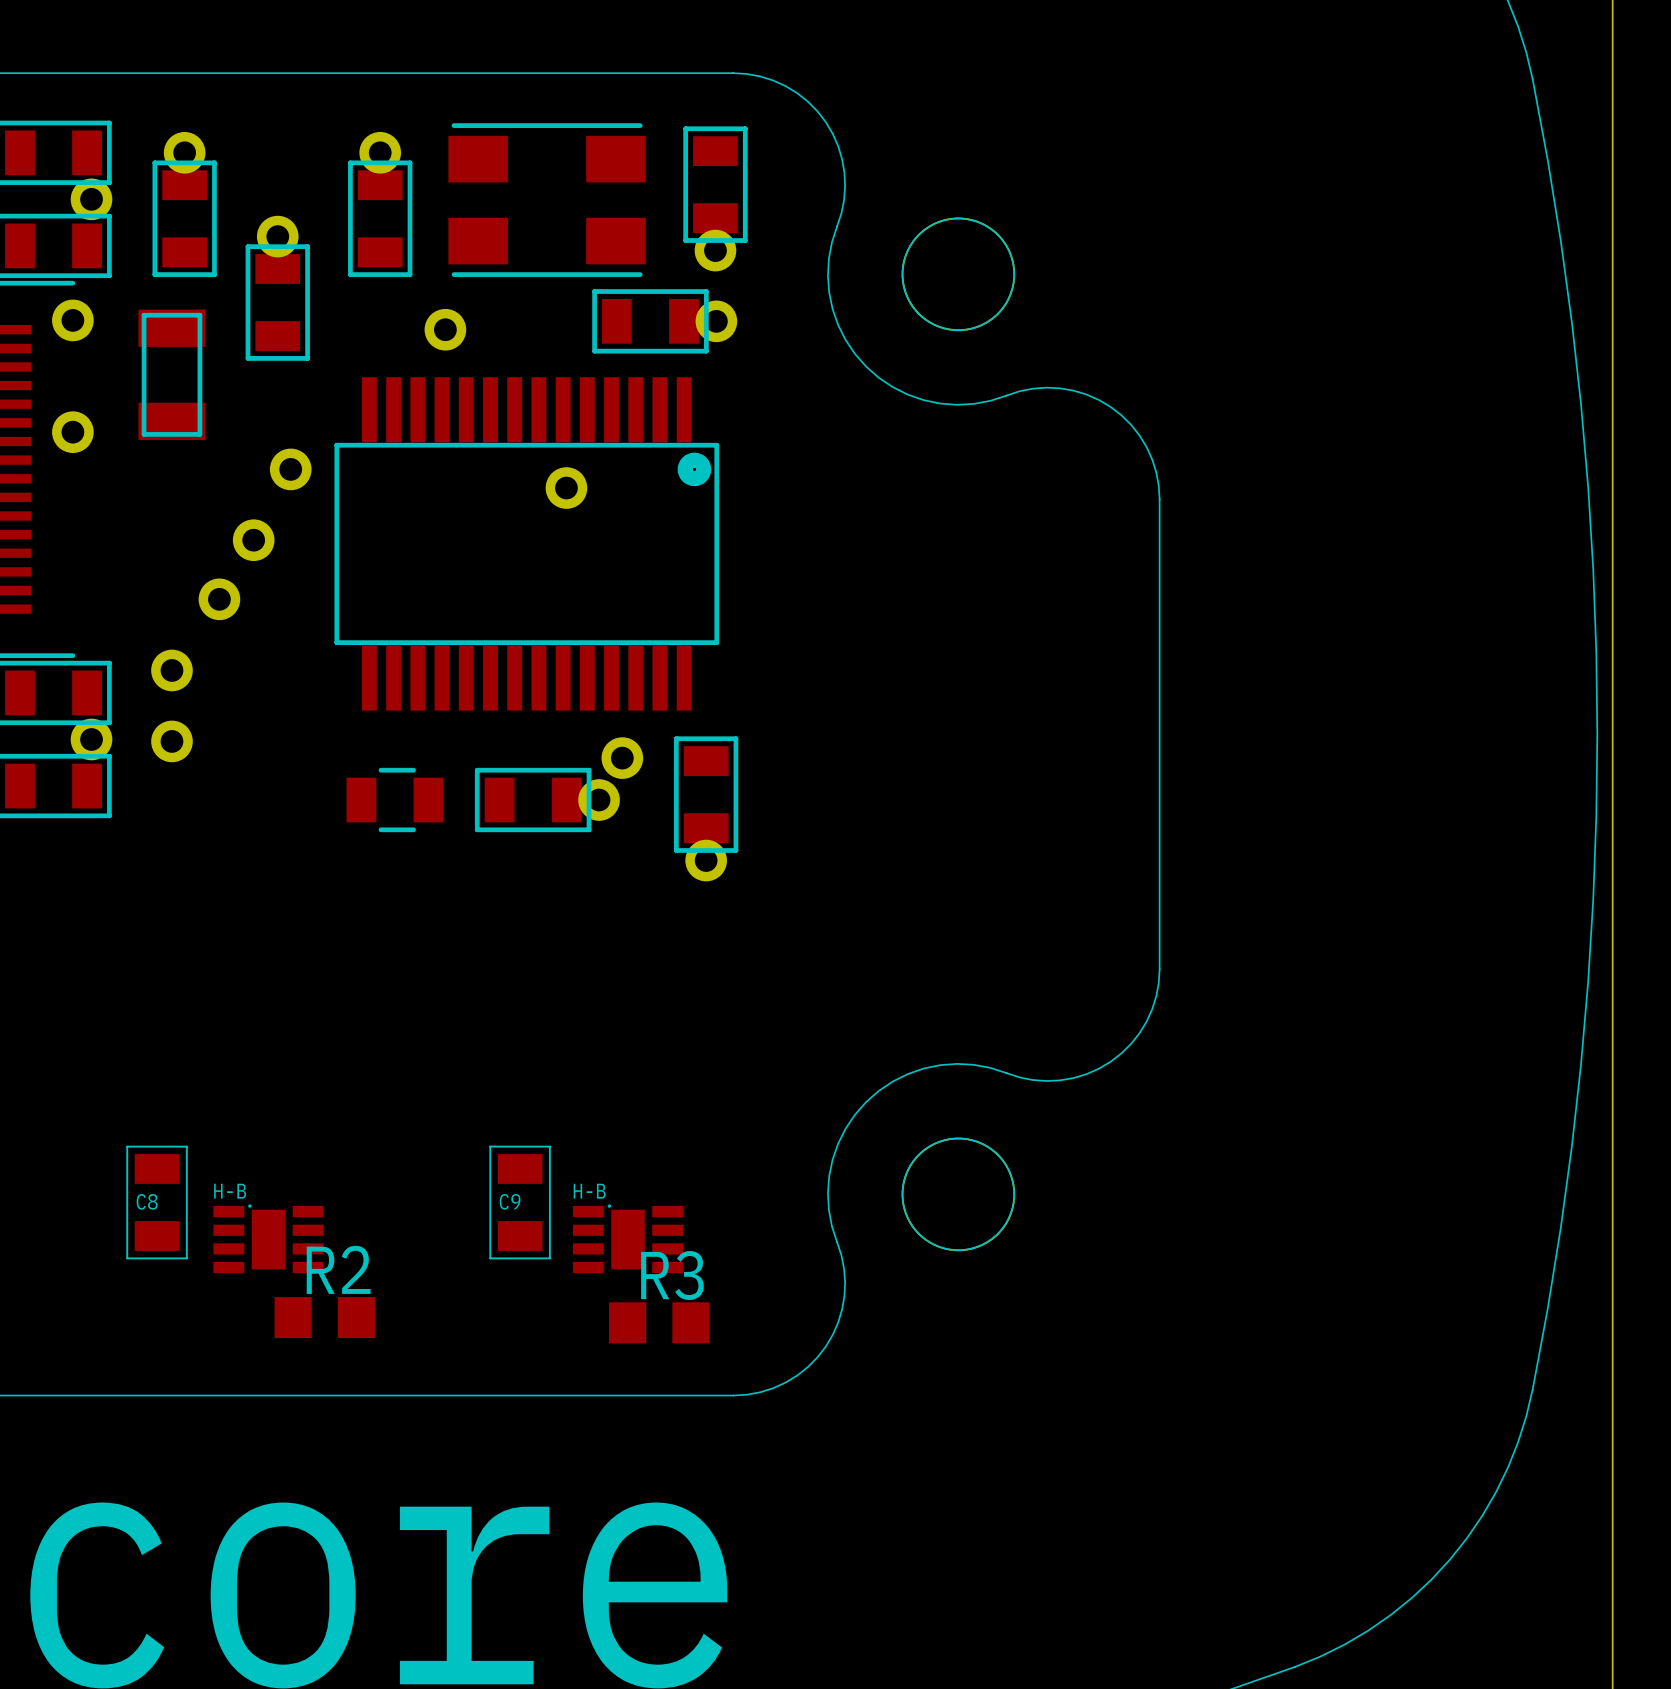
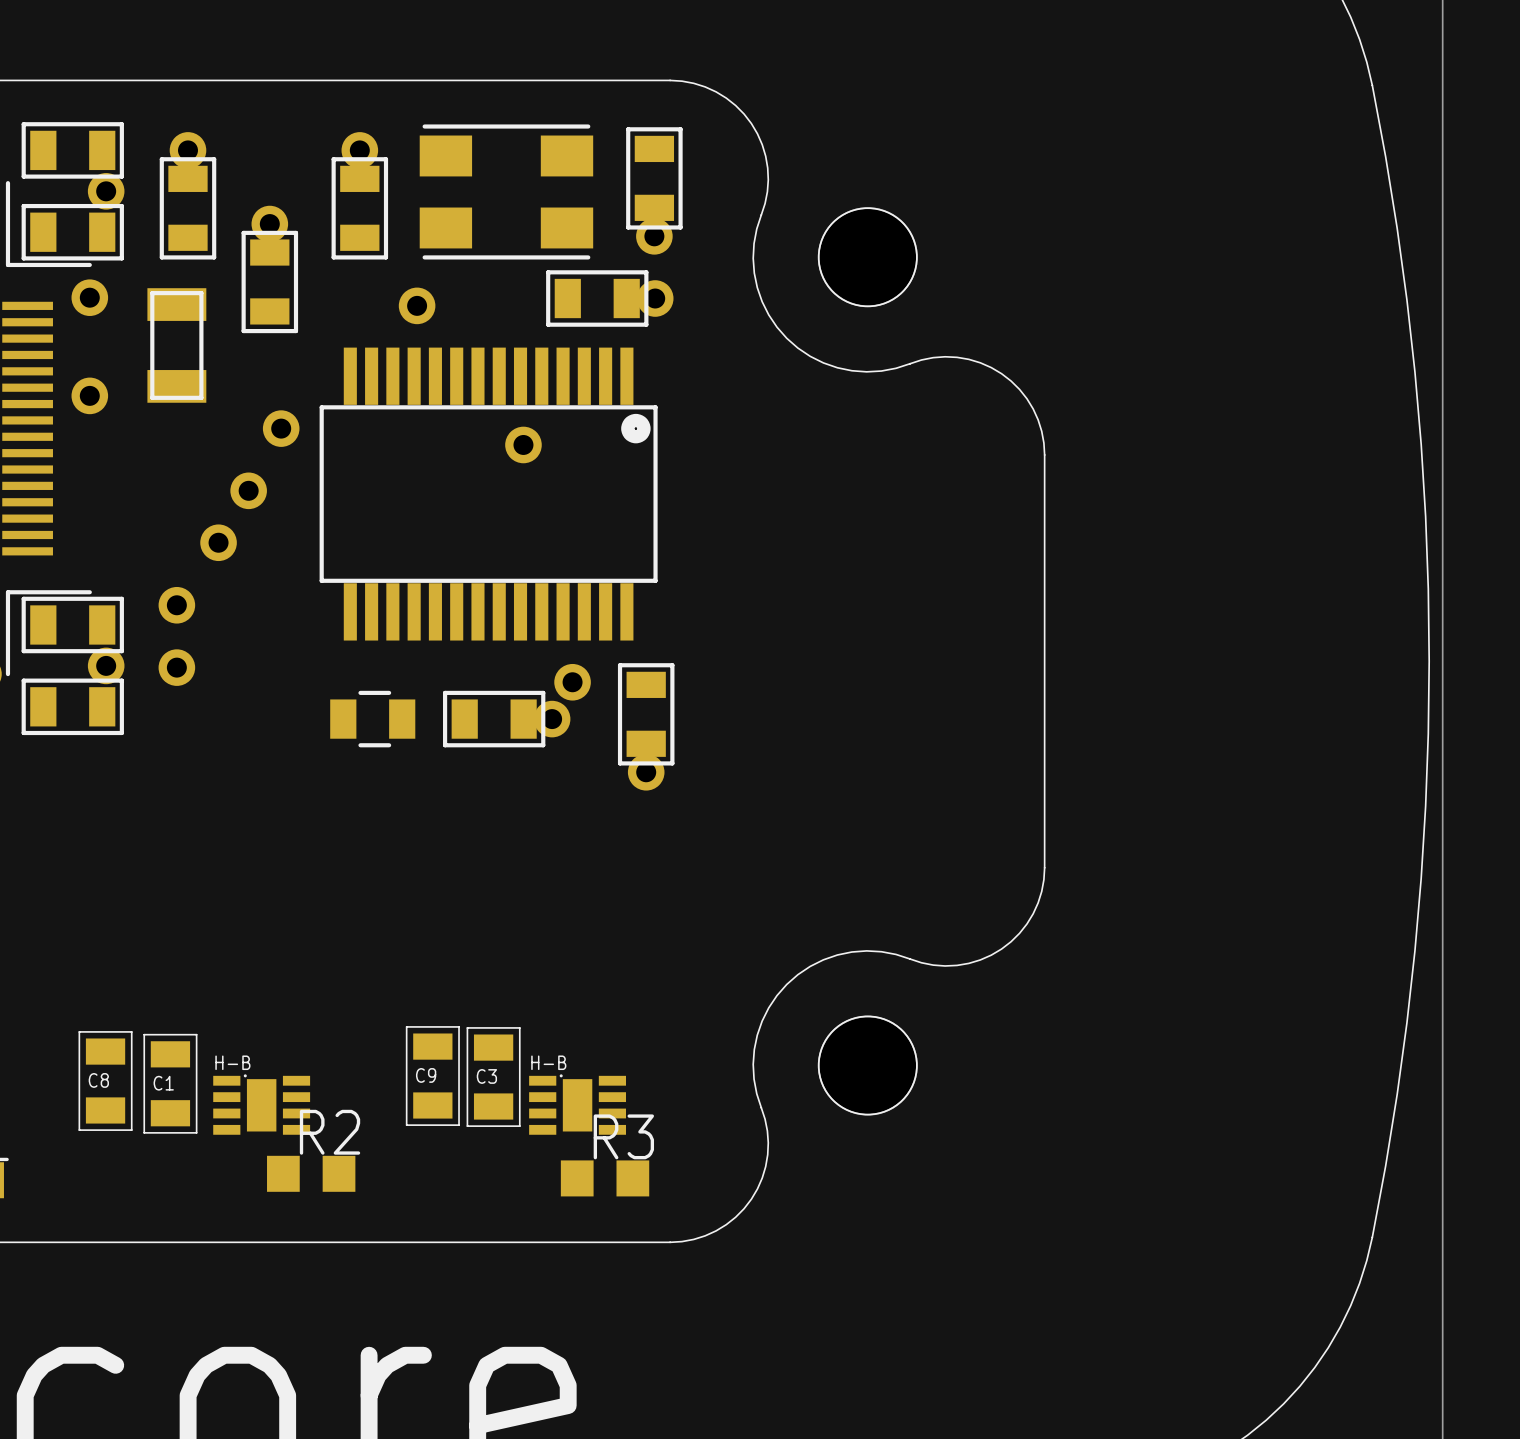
C8 position: (157, 1202) -> (105, 1081)
C9 position: (520, 1202) -> (432, 1076)
C3: none -> (493, 1077)
C1: none -> (170, 1083)

